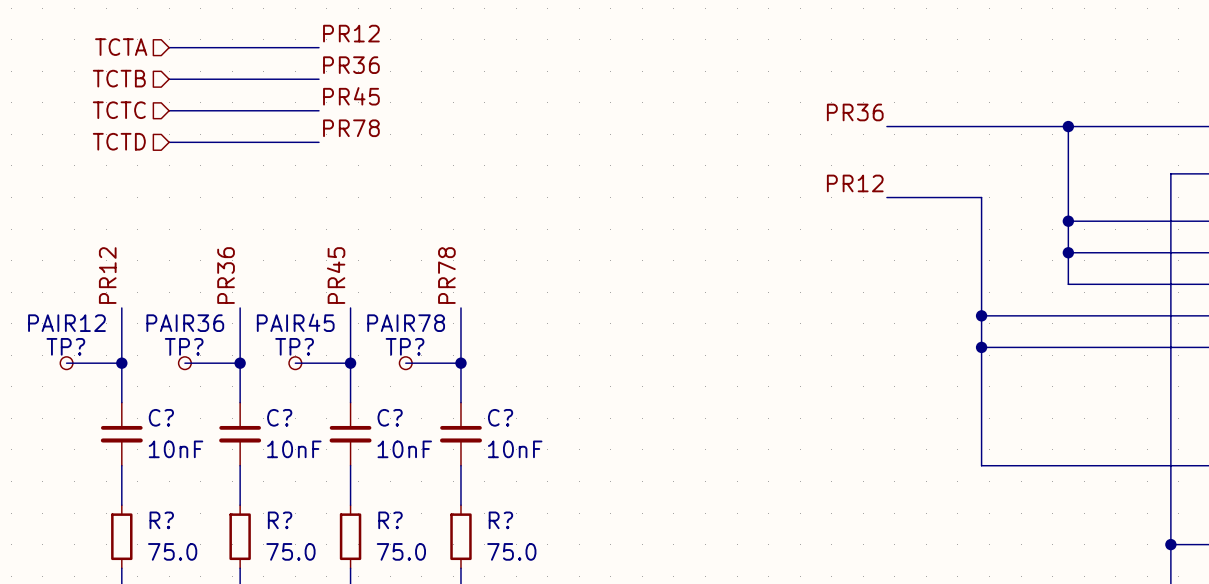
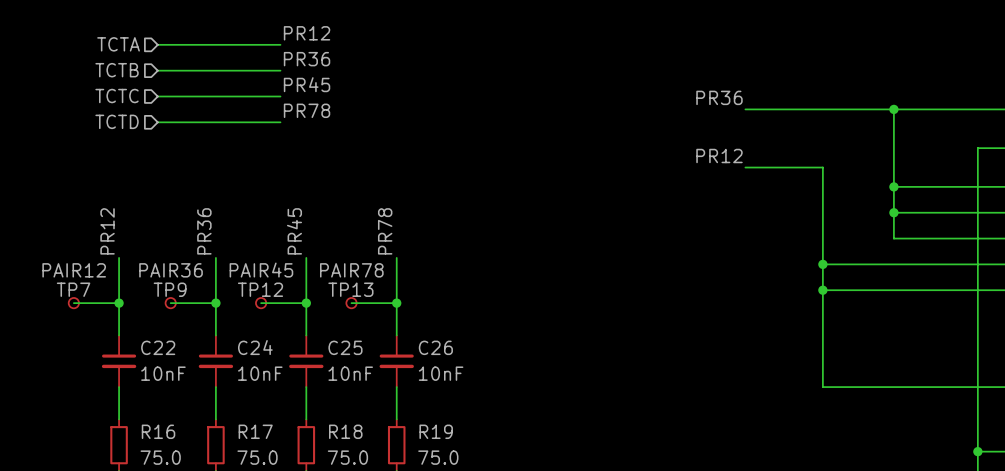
TP? name: TP? (65, 346) -> TP7 (73, 289)
TP? name: TP? (184, 346) -> TP9 (170, 289)
TP? name: TP? (294, 346) -> TP12 (260, 289)
TP? name: TP? (405, 346) -> TP13 (350, 289)
C? name: C? (161, 417) -> C22 (158, 347)
C? name: C? (279, 417) -> C24 (255, 347)
C? name: C? (390, 417) -> C25 (345, 347)
C? name: C? (500, 417) -> C26 (435, 347)
R? name: R? (161, 520) -> R16 (158, 431)
R? name: R? (280, 520) -> R17 (255, 431)
R? name: R? (390, 520) -> R18 (345, 431)
R? name: R? (500, 520) -> R19 (436, 431)

